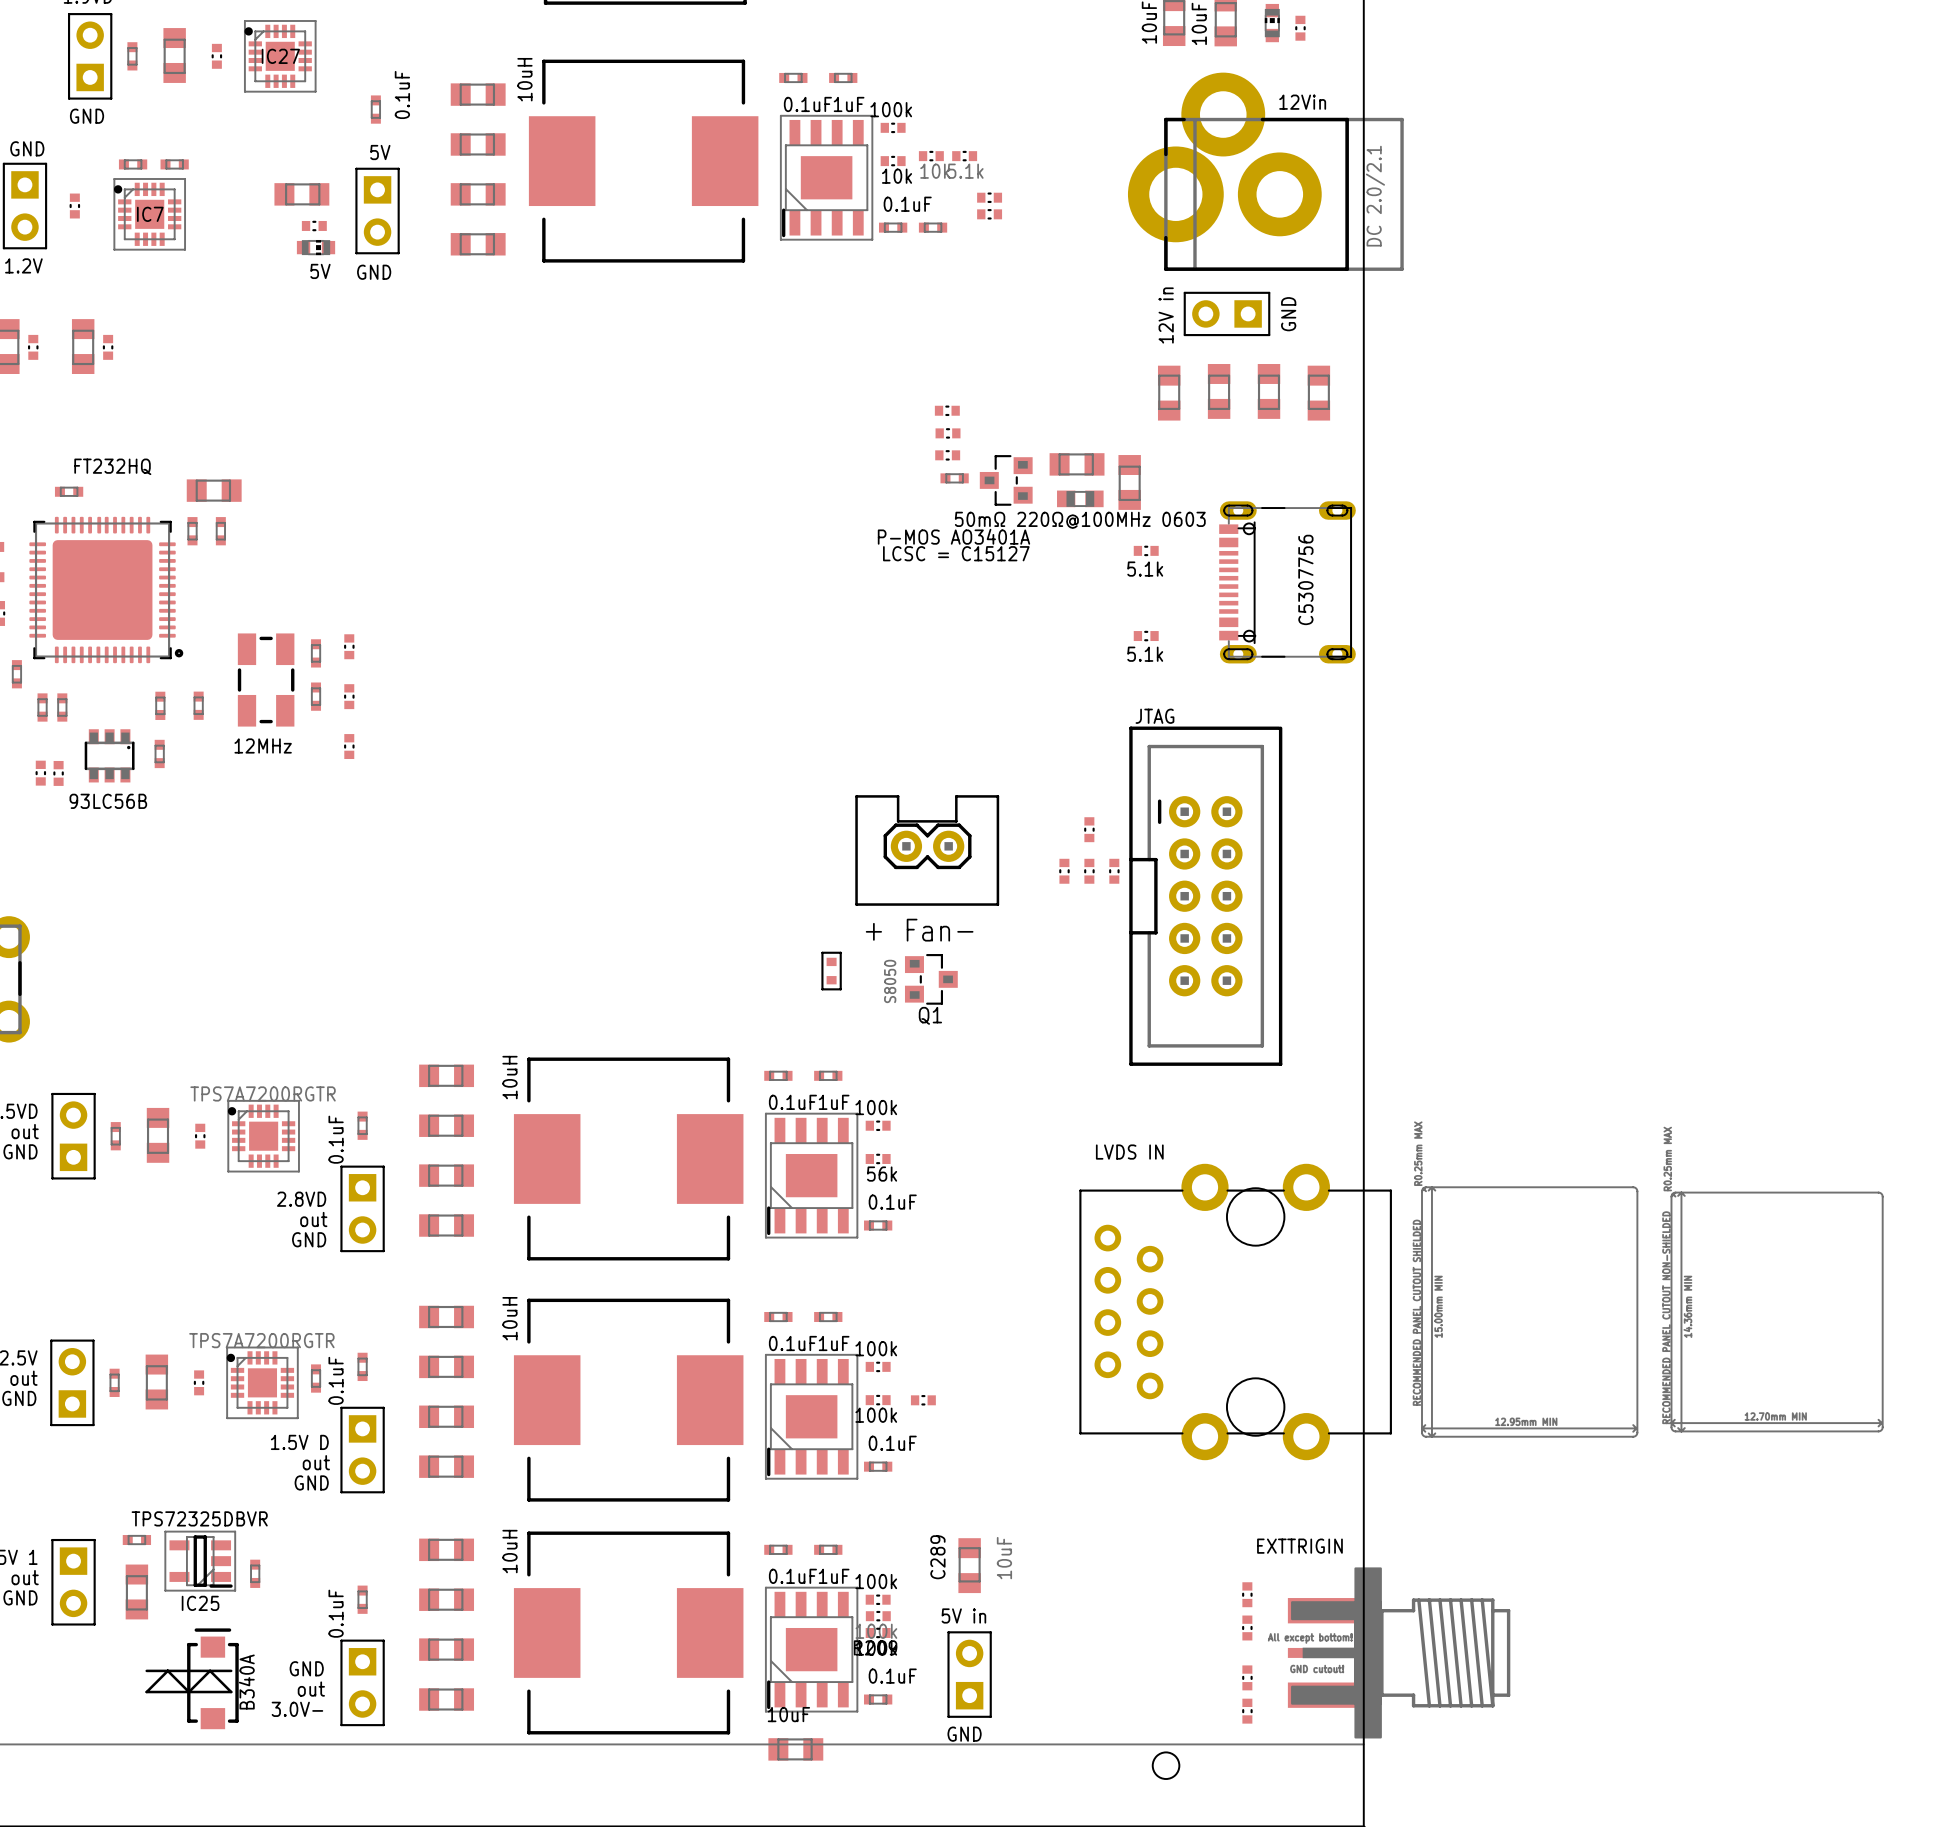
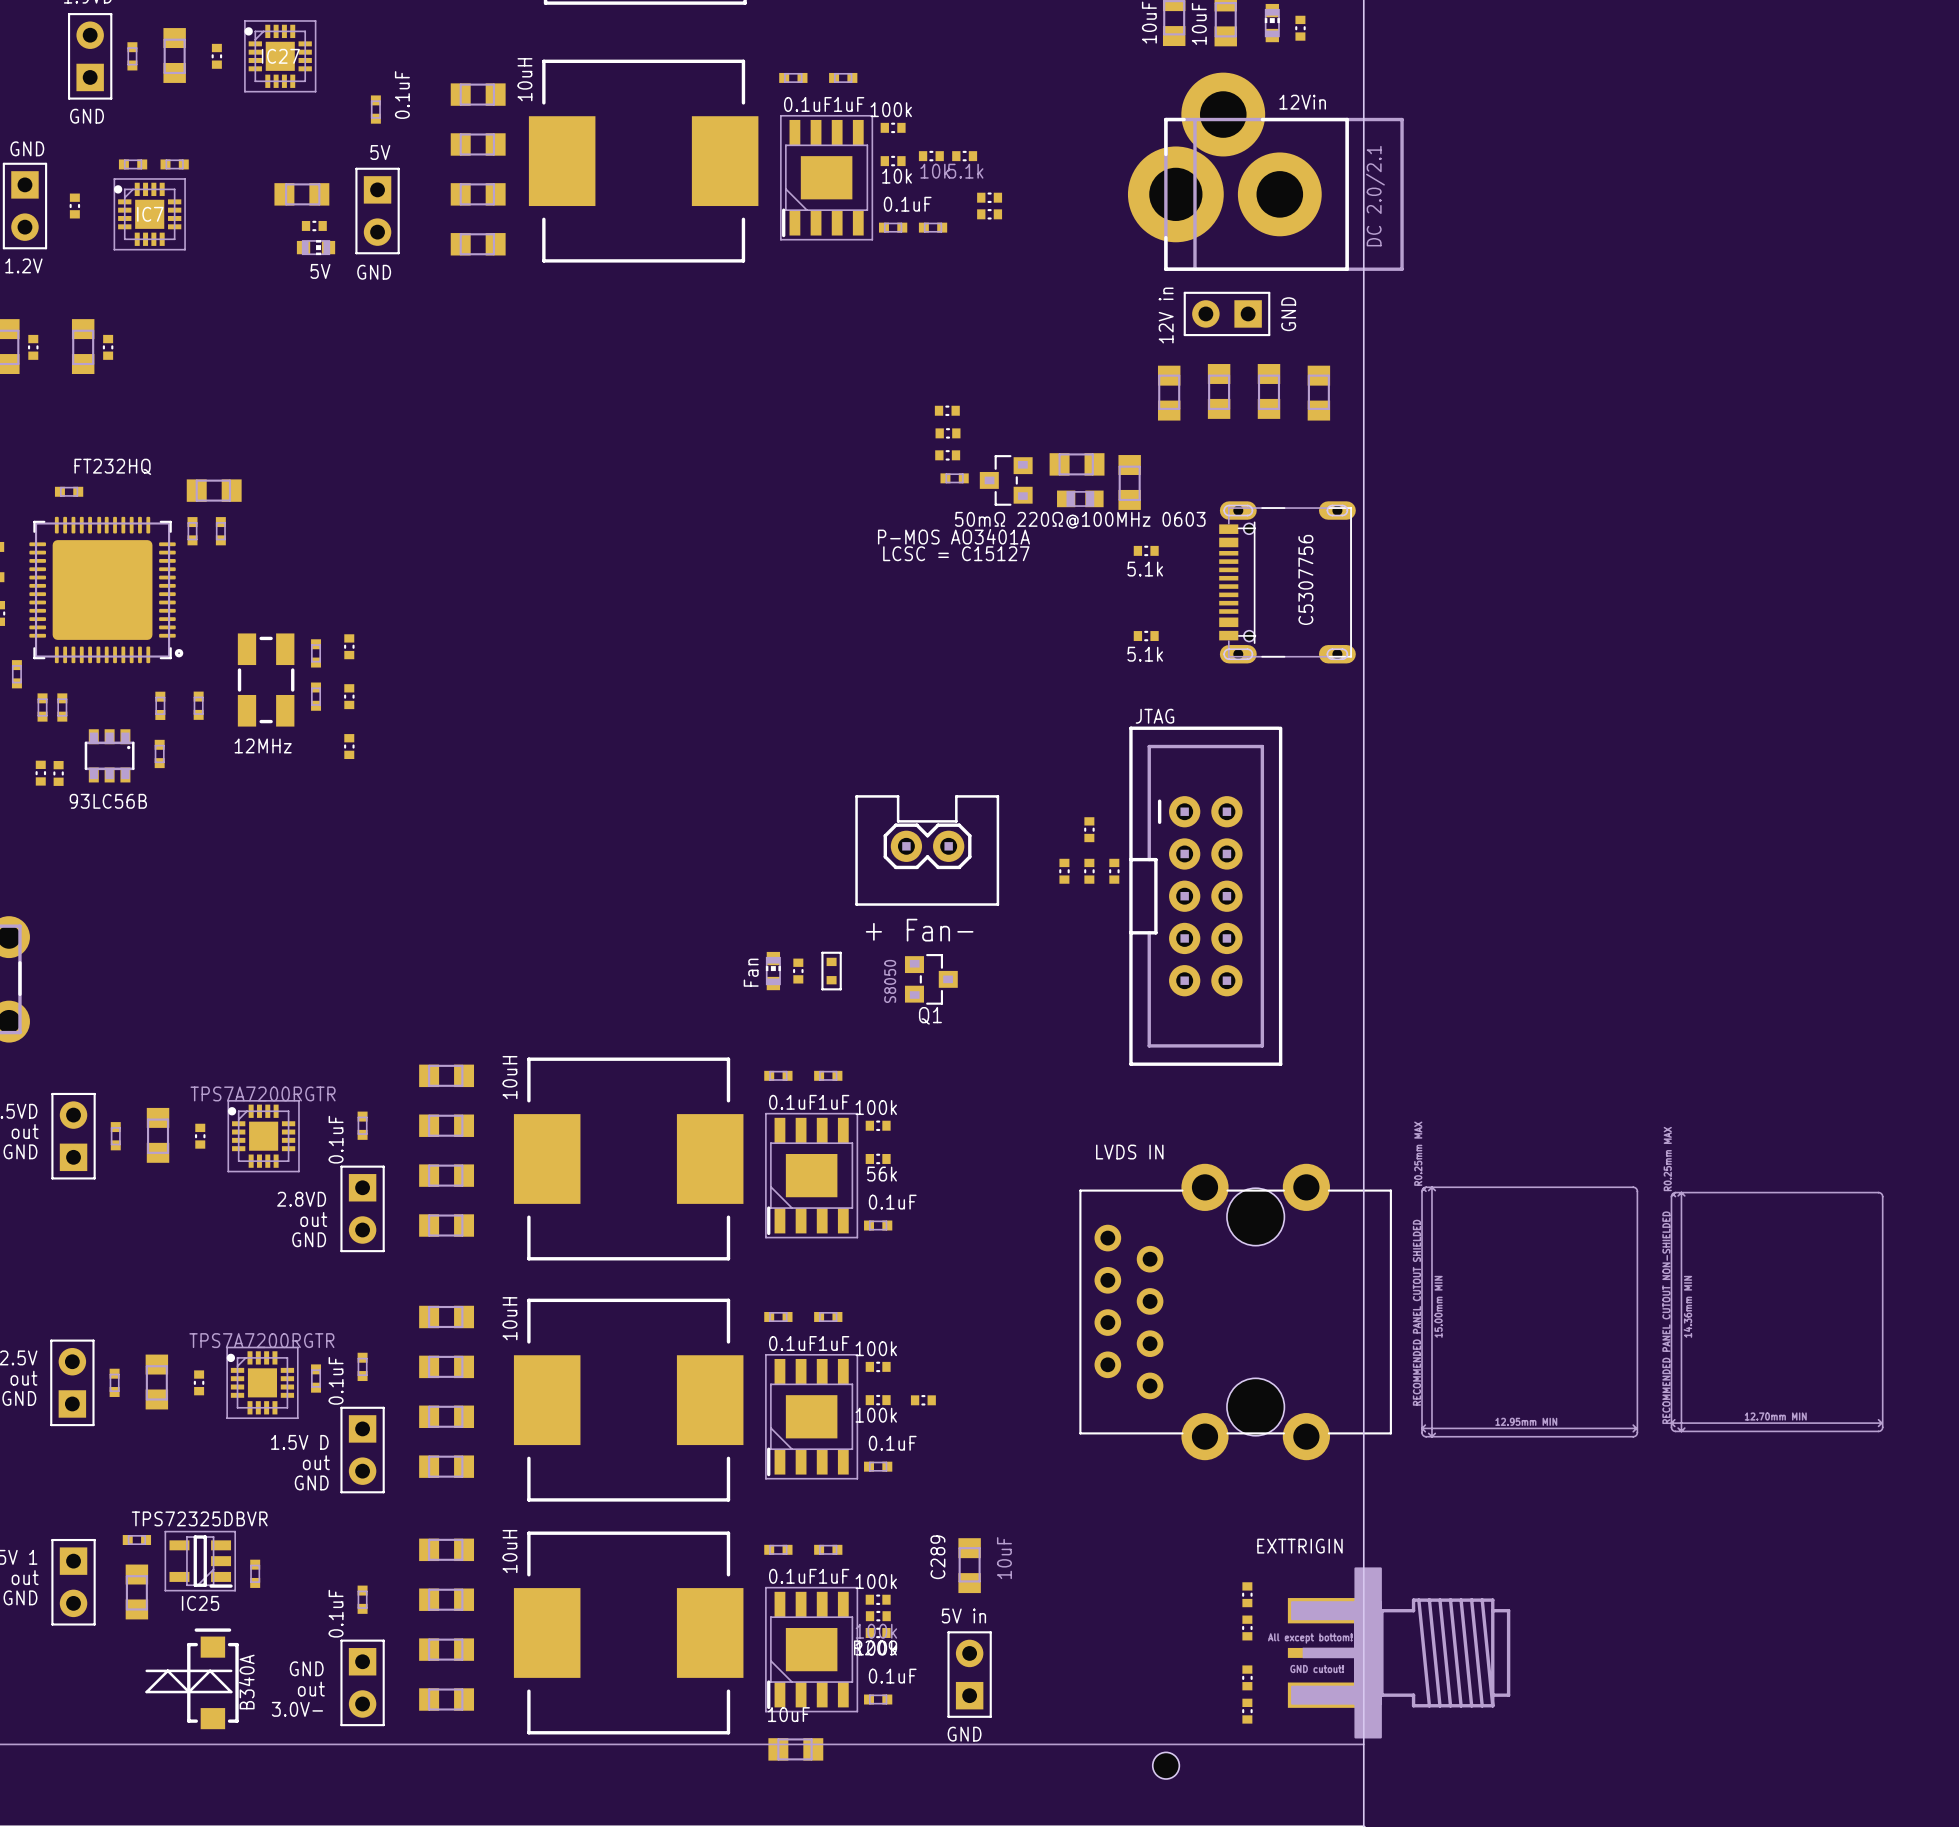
part: none -> (773, 971)
part: none -> (798, 971)
text: none -> Fan (751, 972)

